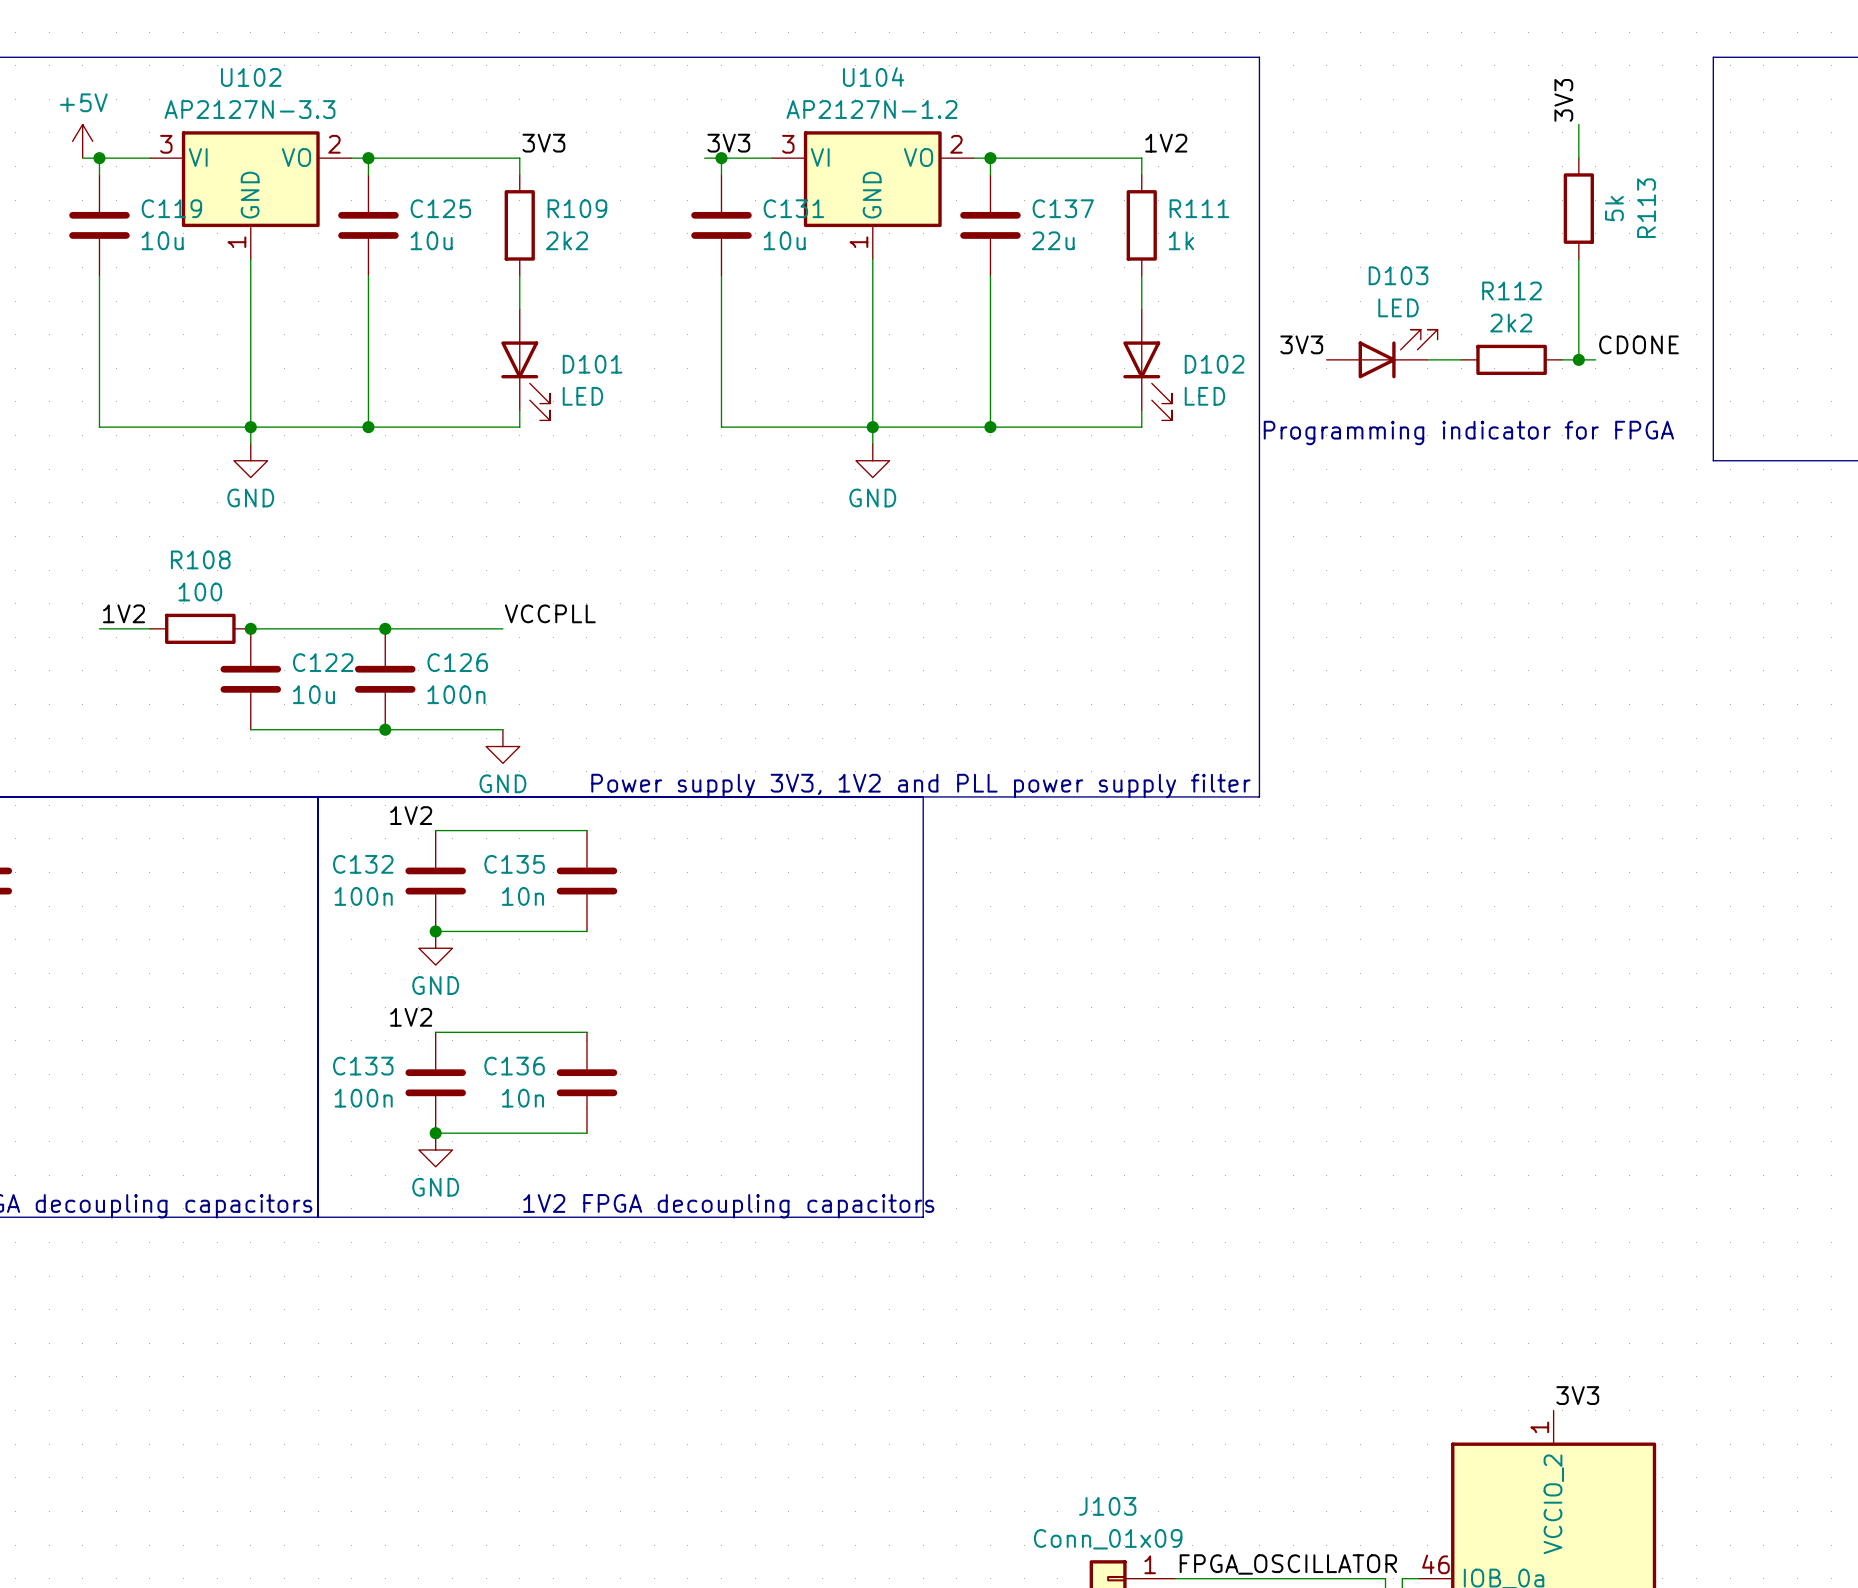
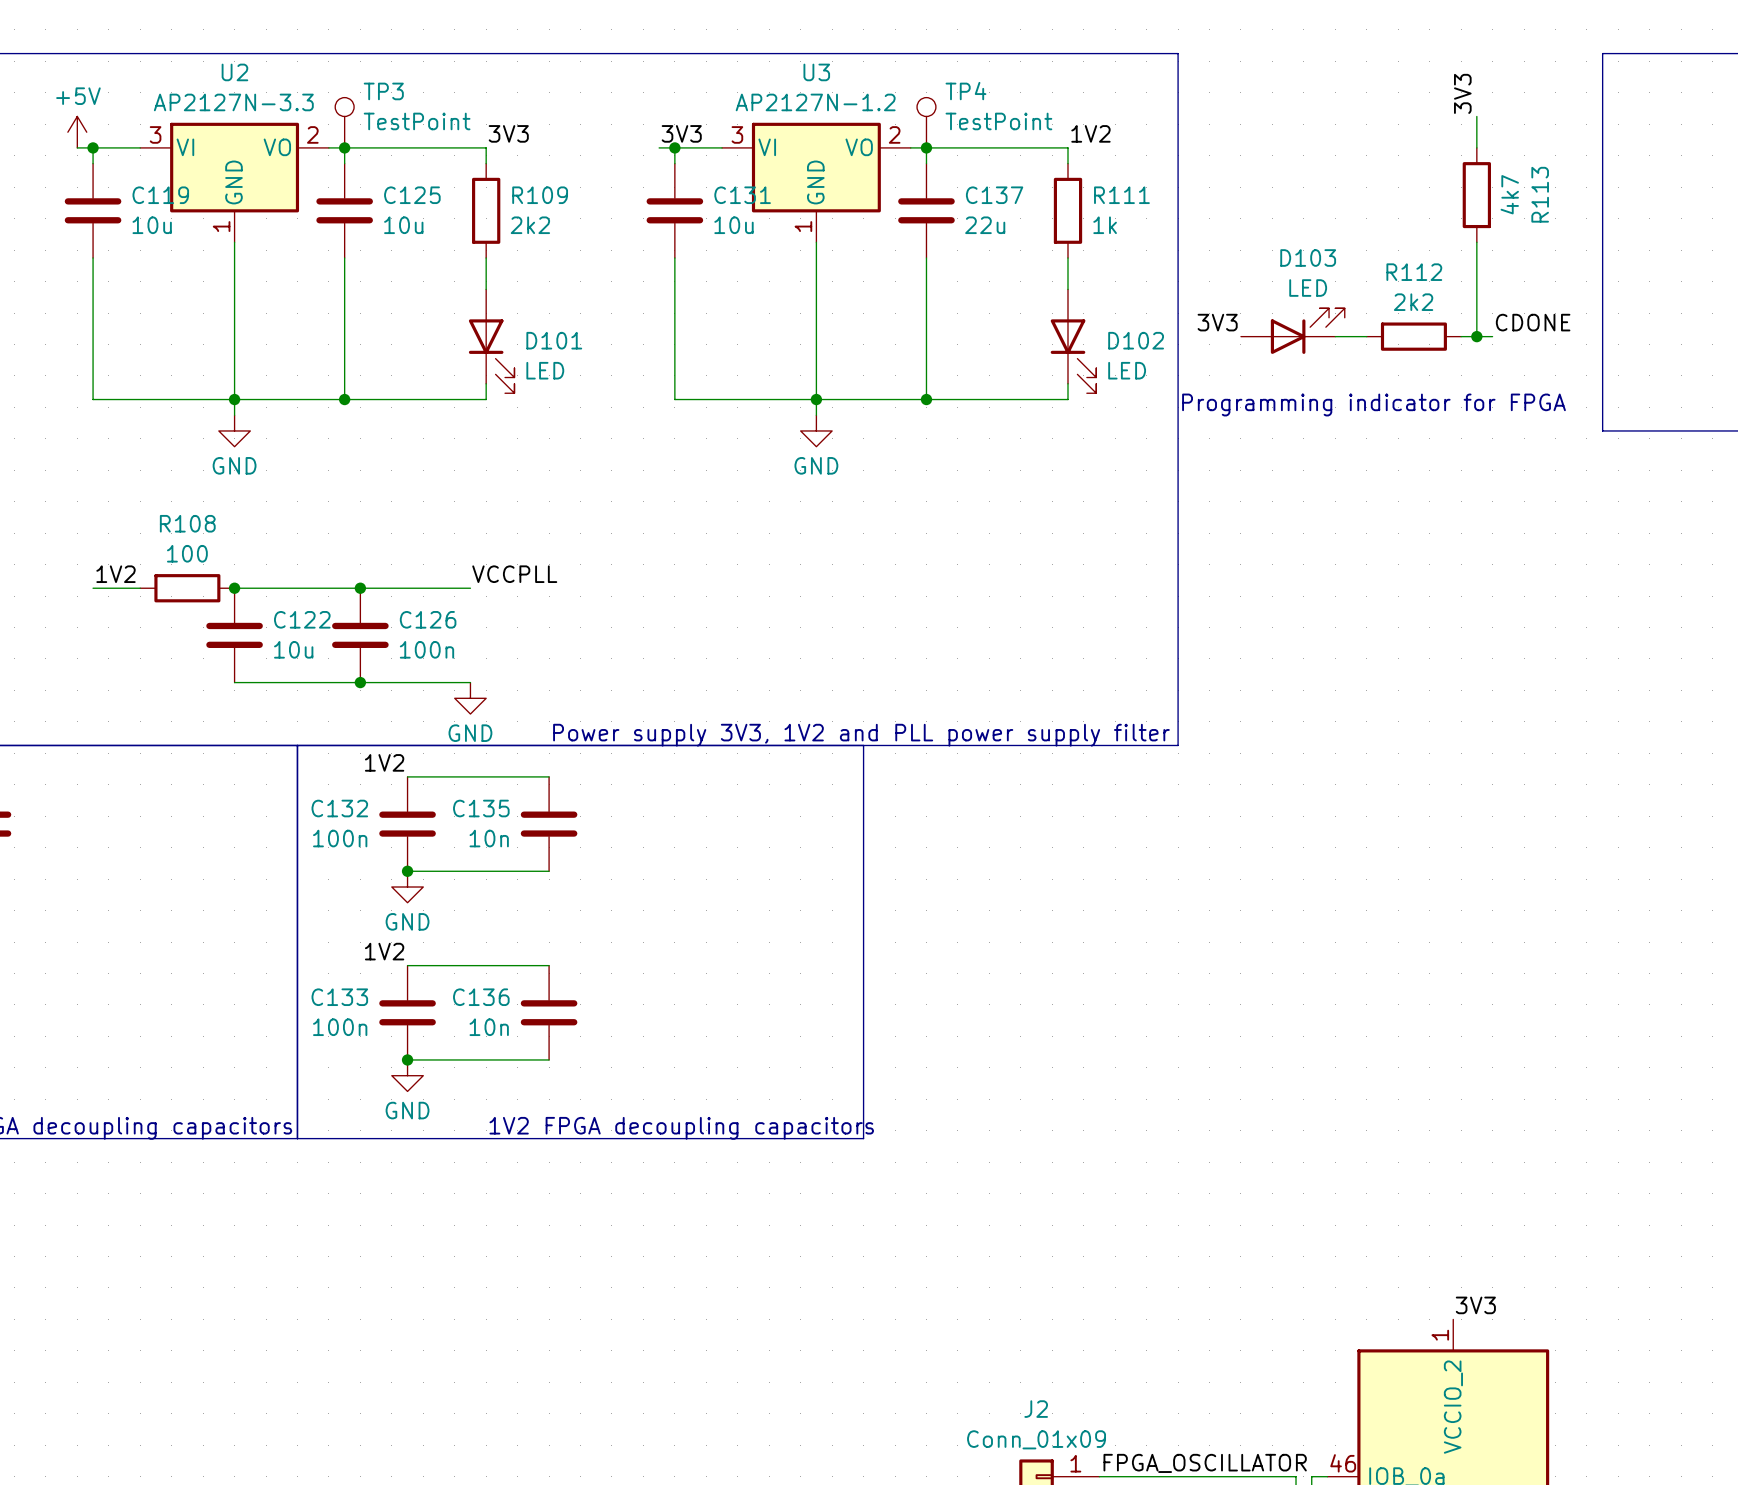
U102 name: U102 (251, 77) -> U2 (234, 72)
U104 name: U104 (873, 77) -> U3 (816, 72)
TP3: none -> TestPoint (344, 122)
TP4: none -> TestPoint (926, 122)
R113 value: 5k (1614, 208) -> 4k7 (1509, 194)
J103 name: J103 (1107, 1506) -> J2 (1036, 1409)

